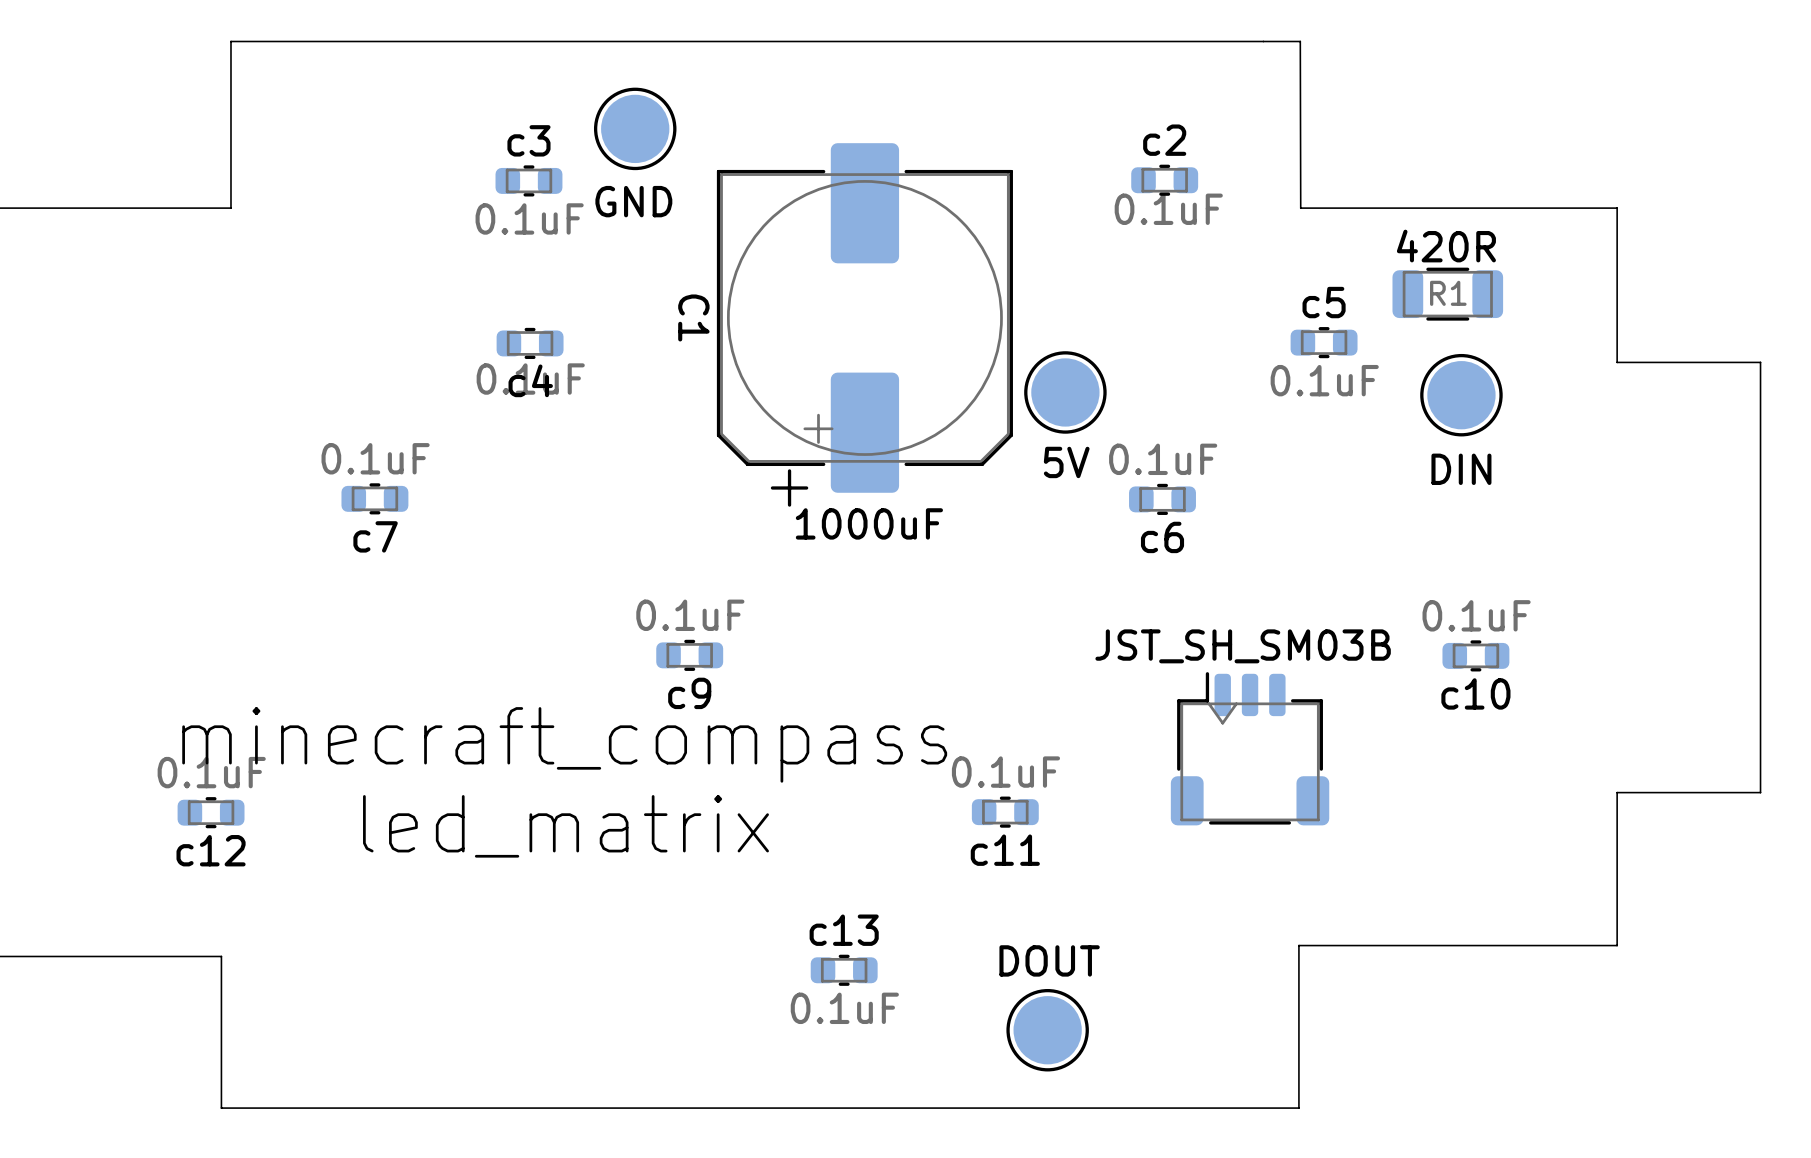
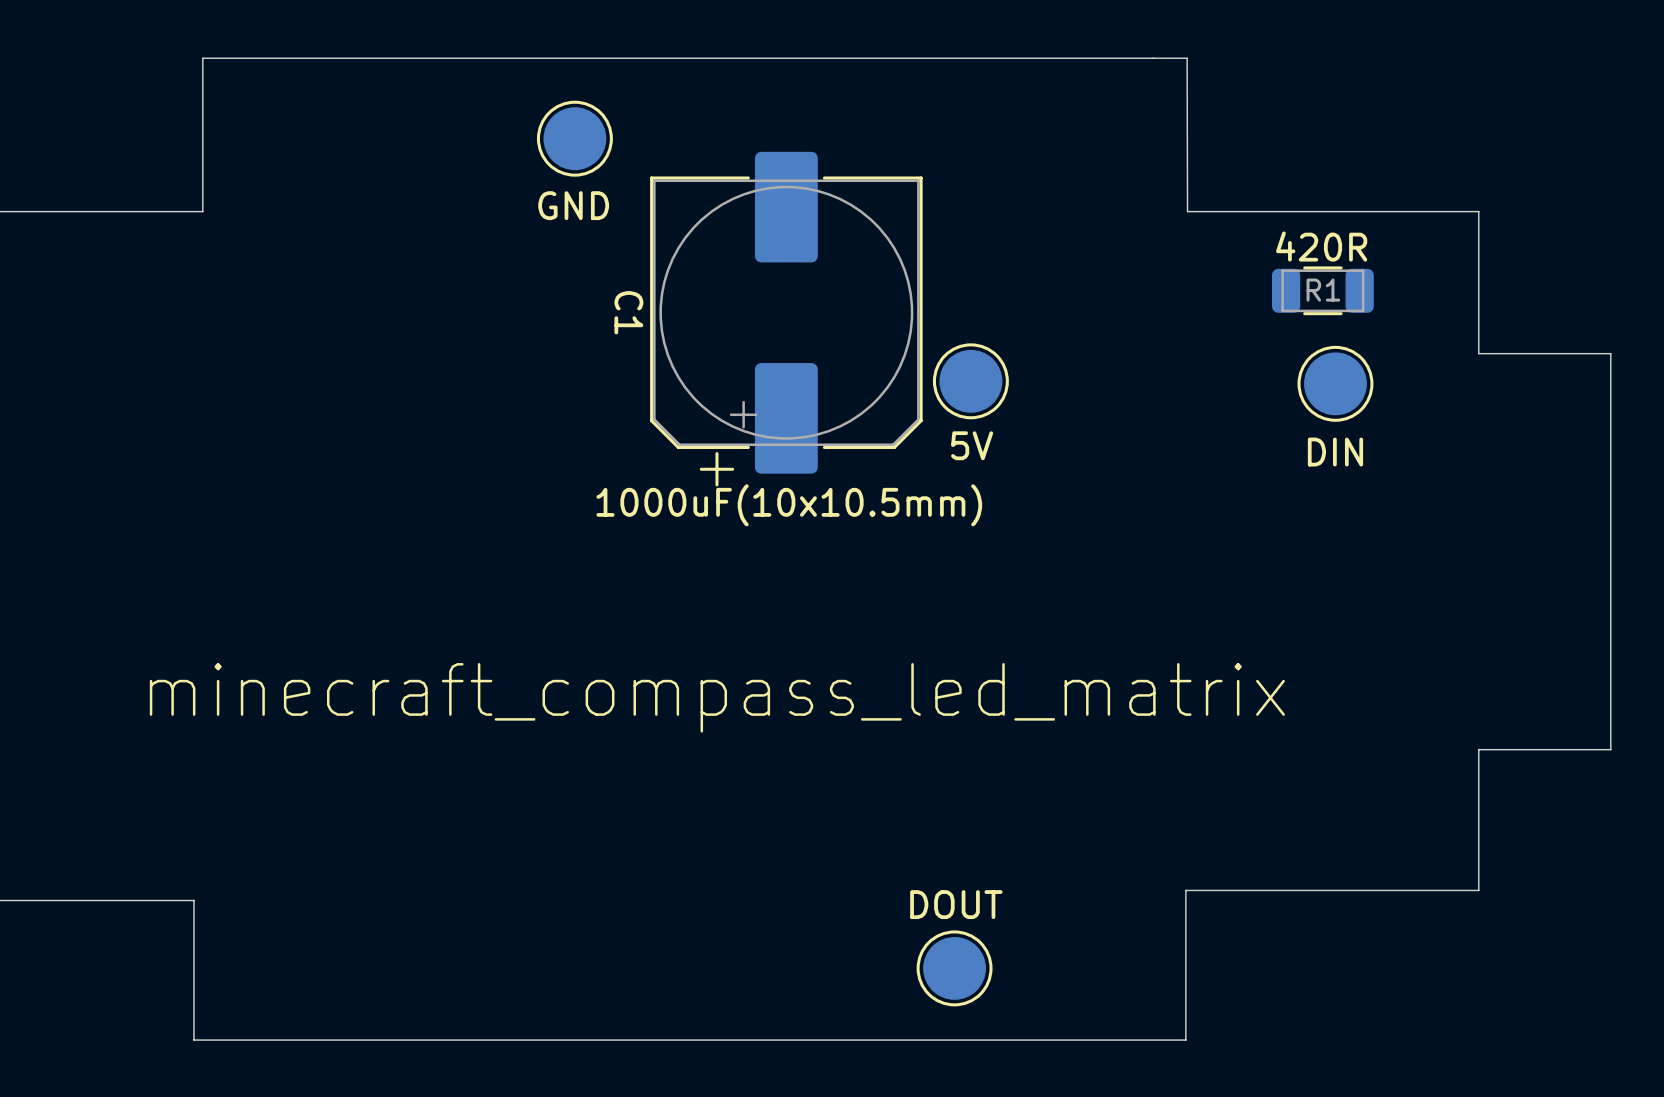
c3: 0.1uF (528, 180) -> none
c2: 0.1uF (1164, 180) -> none
c5: 0.1uF (1324, 342) -> none
c4: 0.1uF (530, 343) -> none
c7: 0.1uF (374, 498) -> none
c6: 0.1uF (1162, 499) -> none
C1 value: 1000uF (869, 523) -> 1000uF(10x10.5mm) (789, 505)
c9: 0.1uF (689, 655) -> none
c10: 0.1uF (1475, 655) -> none
text: minecraft_compass (564, 744) -> minecraft_compass_led_matrix (717, 697)
JST_SH_SM03B: (1250, 748) -> none
c12: 0.1uF (211, 812) -> none
c11: 0.1uF (1005, 812) -> none
text: led_matrix (565, 826) -> none
c13: 0.1uF (844, 970) -> none

